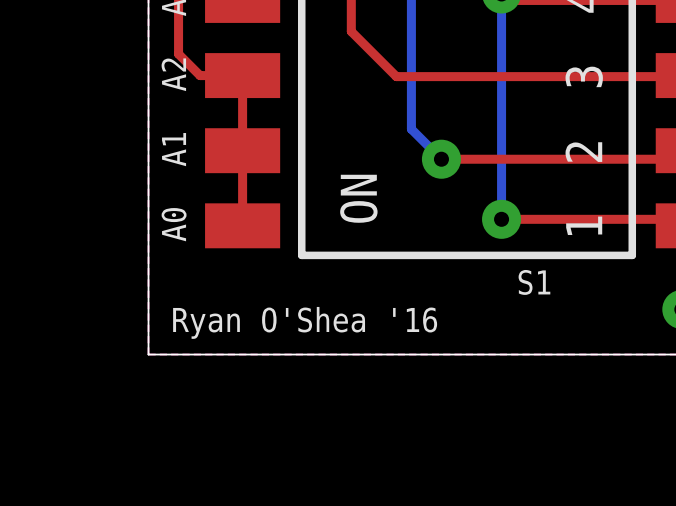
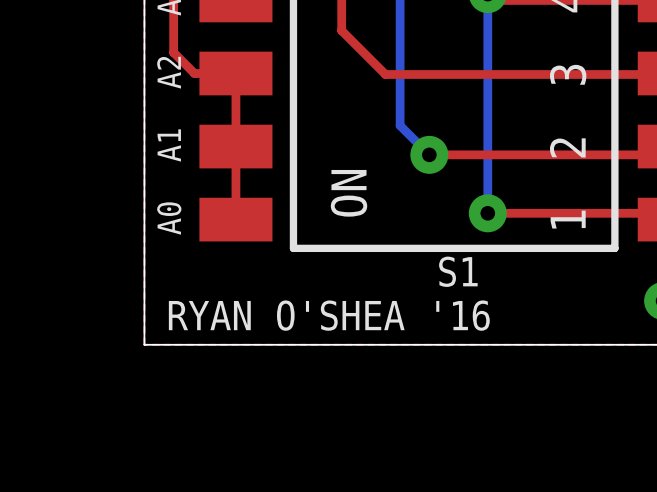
text position: S1 (534, 282) -> S1 (458, 271)
text: Ryan O'Shea '16 (305, 322) -> RYAN O'SHEA '16 (329, 315)

